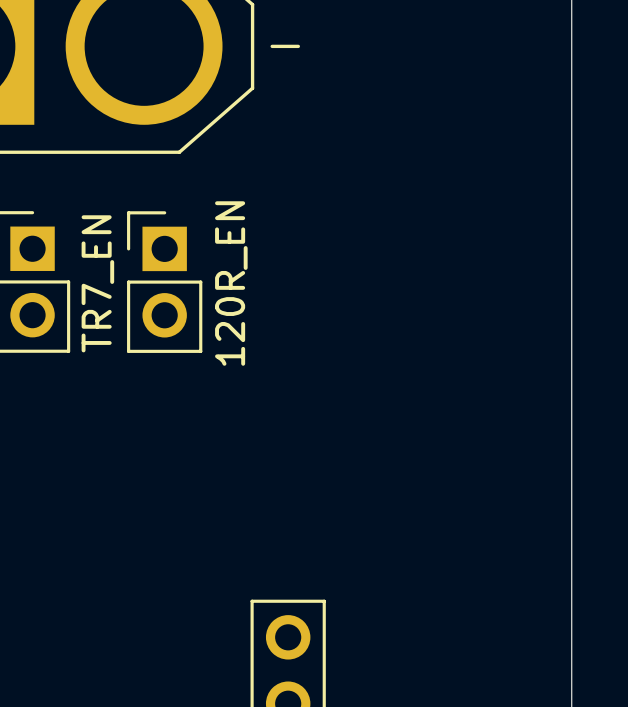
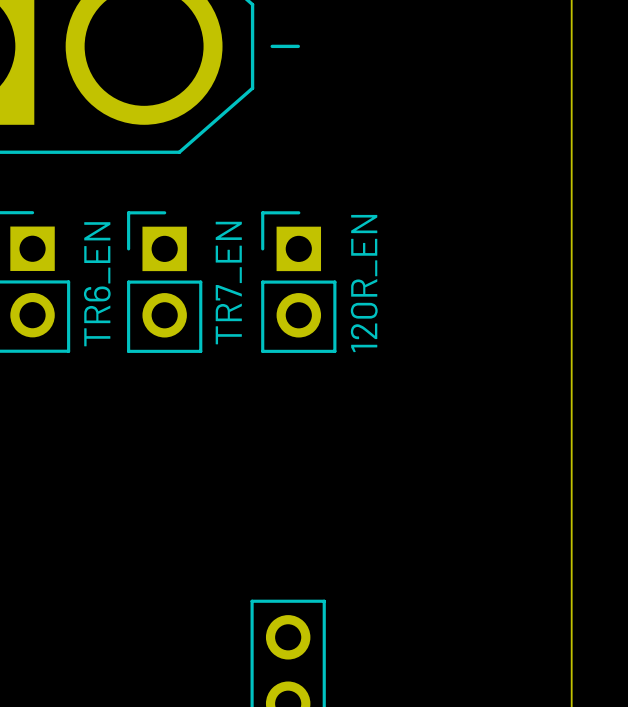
120R_EN: none -> (298, 282)
TR7_EN name: TR7_EN (97, 283) -> TR6_EN (97, 284)
120R_EN name: 120R_EN (231, 283) -> TR7_EN (228, 283)

